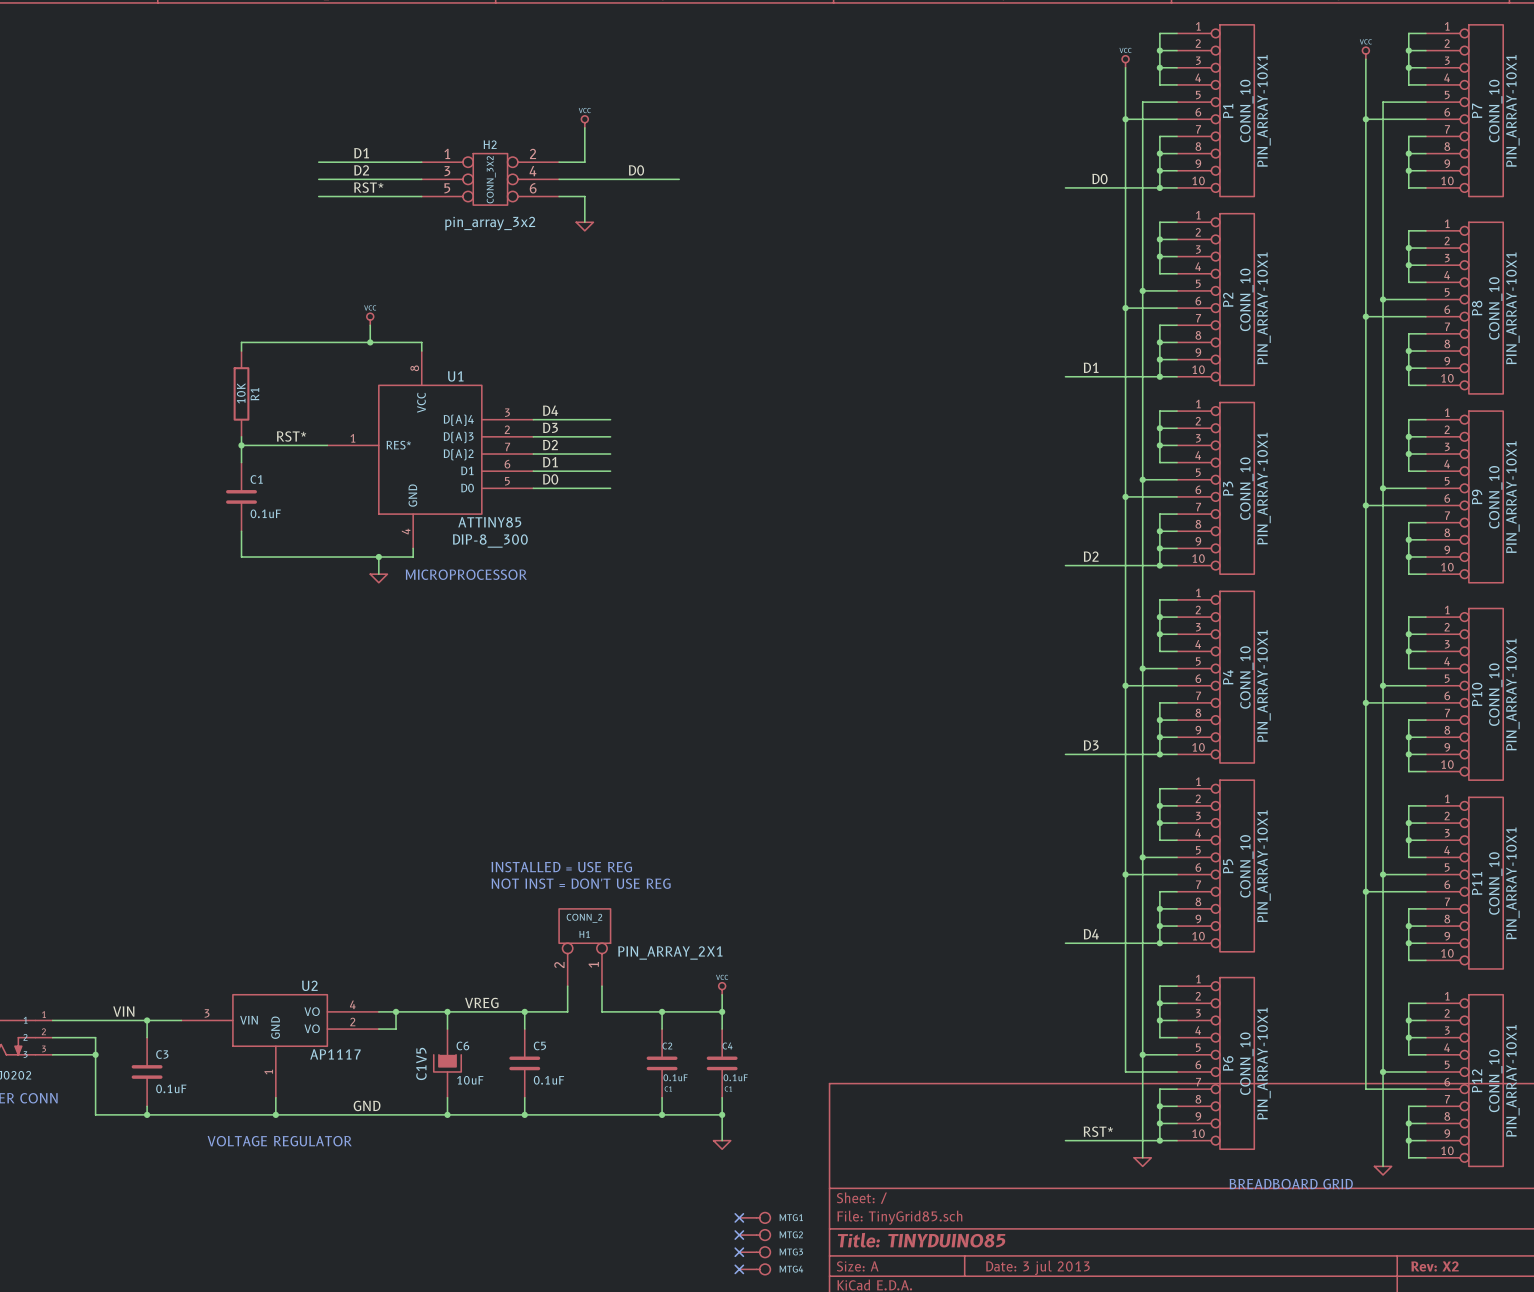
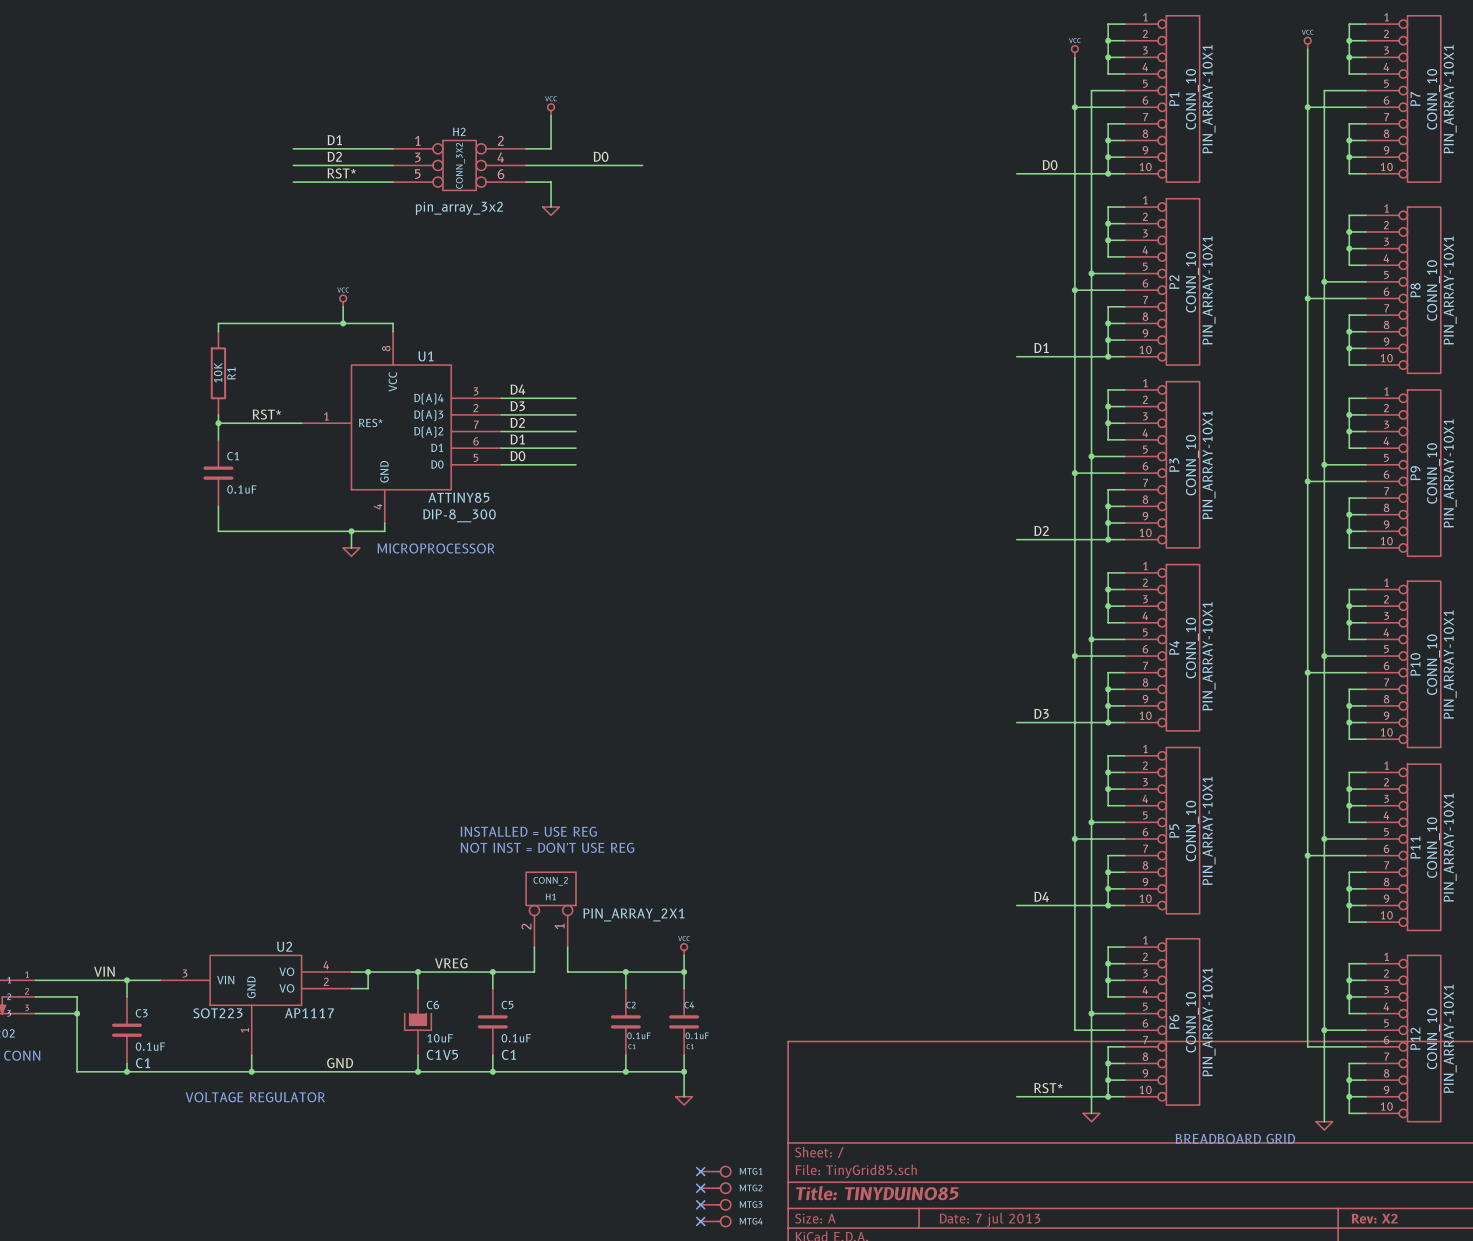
U2 text: none -> SOT223 (217, 1013)
C6 text rotation: 0° (421, 1063) -> 90° clockwise (442, 1054)
C6 text position: C1V5 (421, 1063) -> C1V5 (442, 1054)
C5 text: none -> C1 (508, 1054)
C3 text: none -> C1 (143, 1063)
title block: Date: 3 jul 2013 (1037, 1267) -> Date: 7 jul 2013 (990, 1219)

